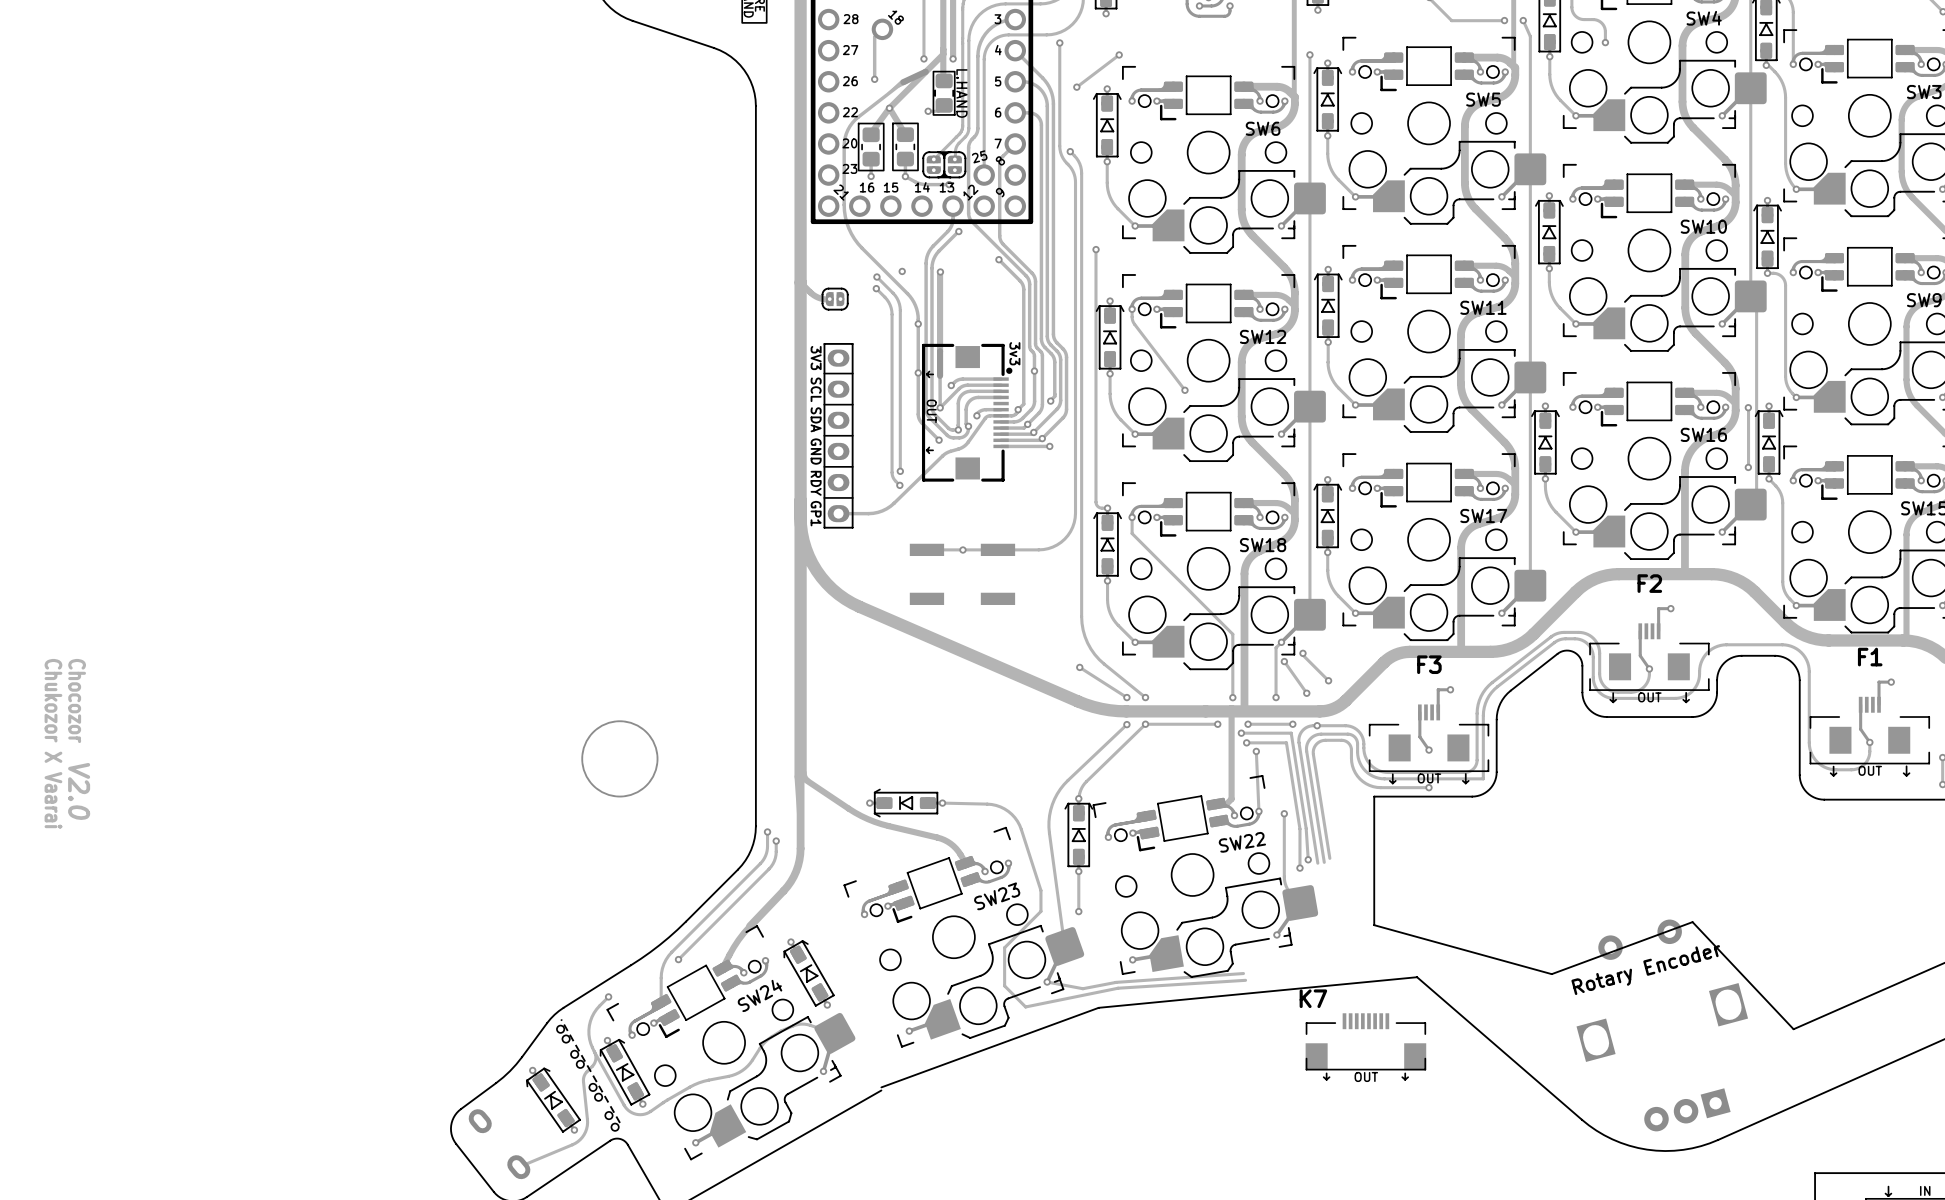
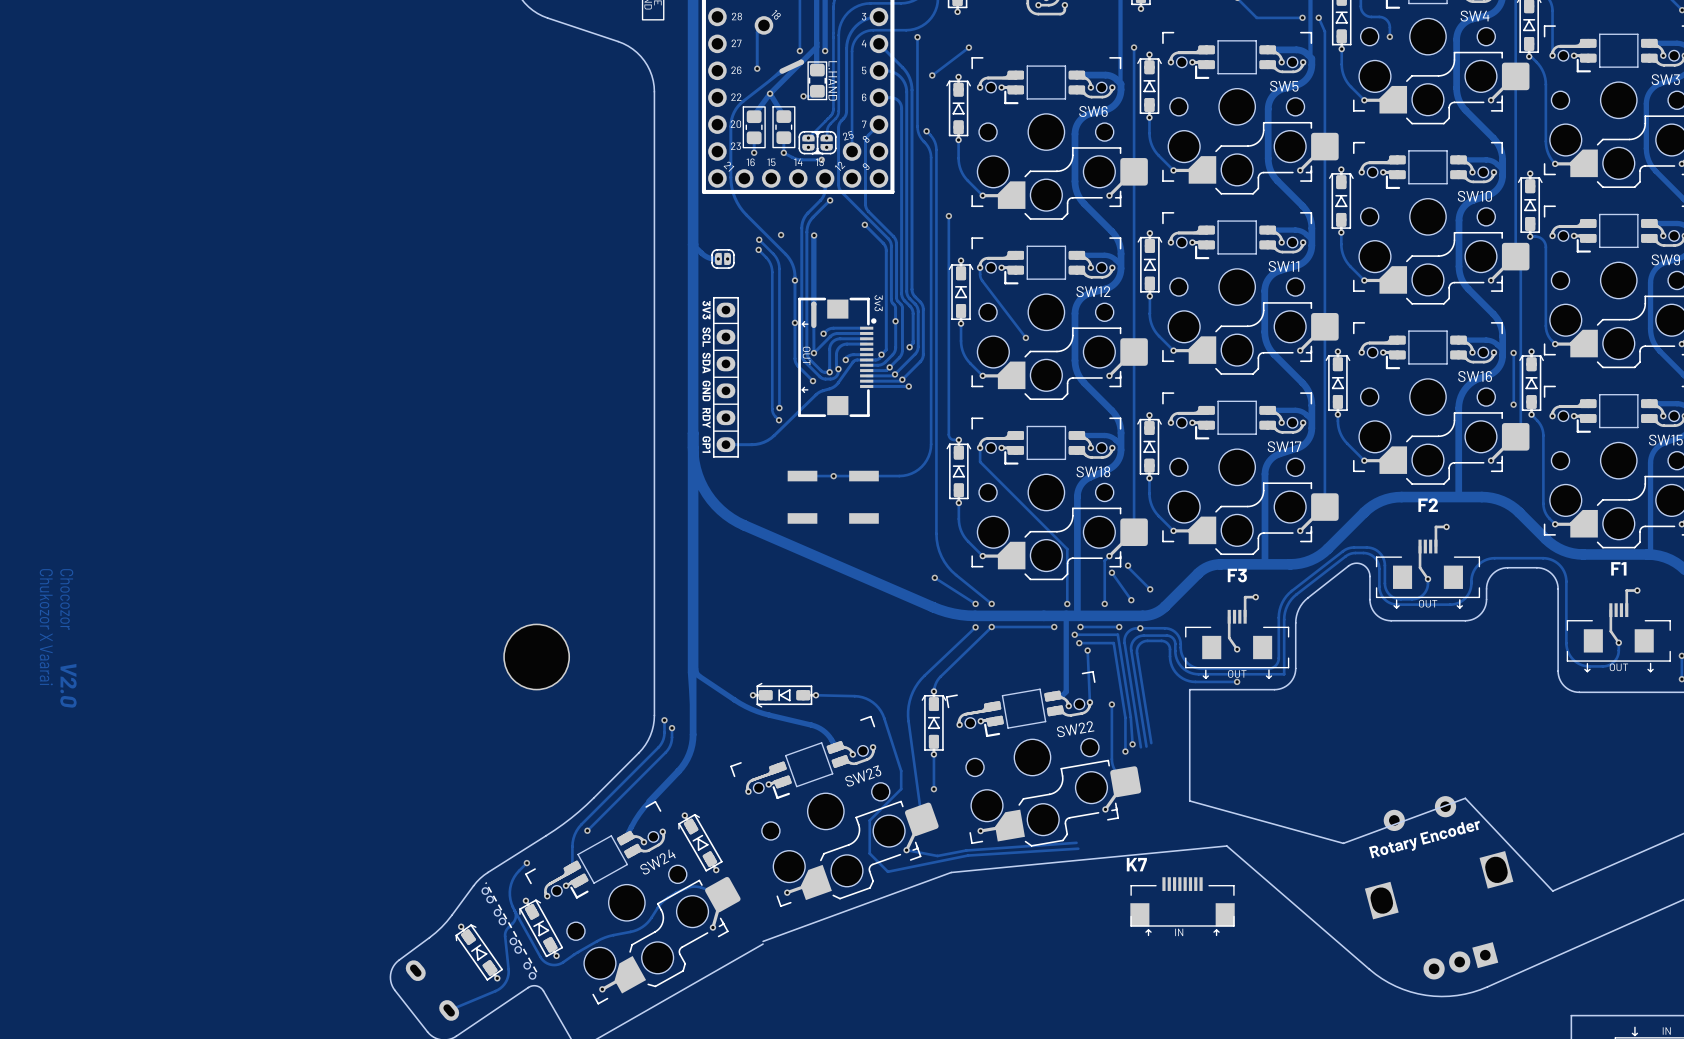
K7 footprint: [1305, 1013, 1427, 1081] -> [1130, 877, 1235, 936]

